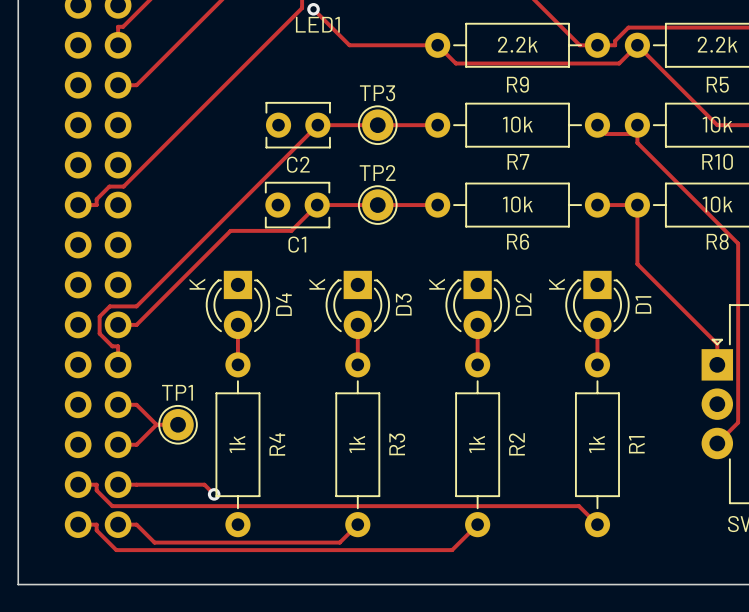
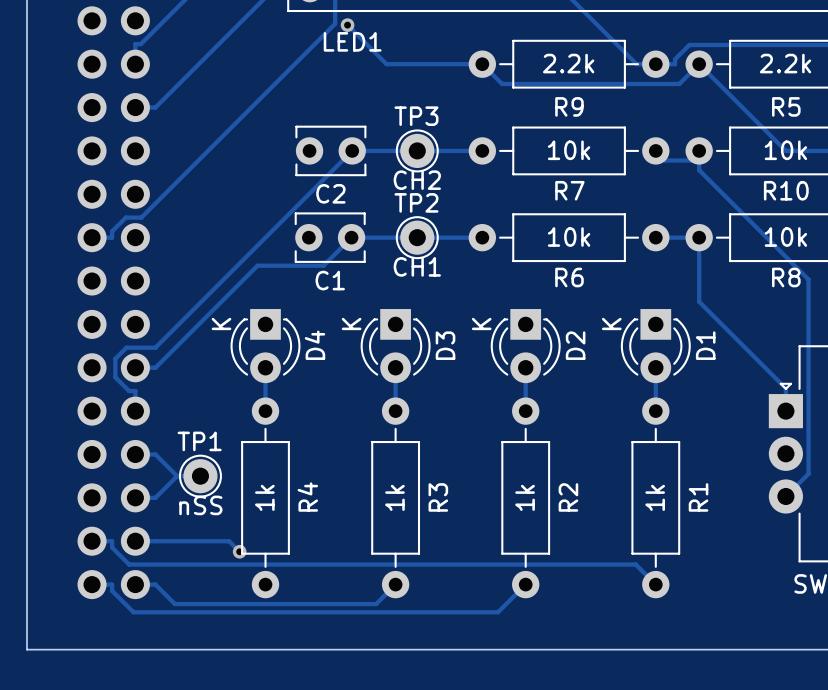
TP3 value: none -> CH2 (417, 180)
TP2 value: none -> CH1 (417, 266)
TP1 value: none -> nSS (200, 505)

